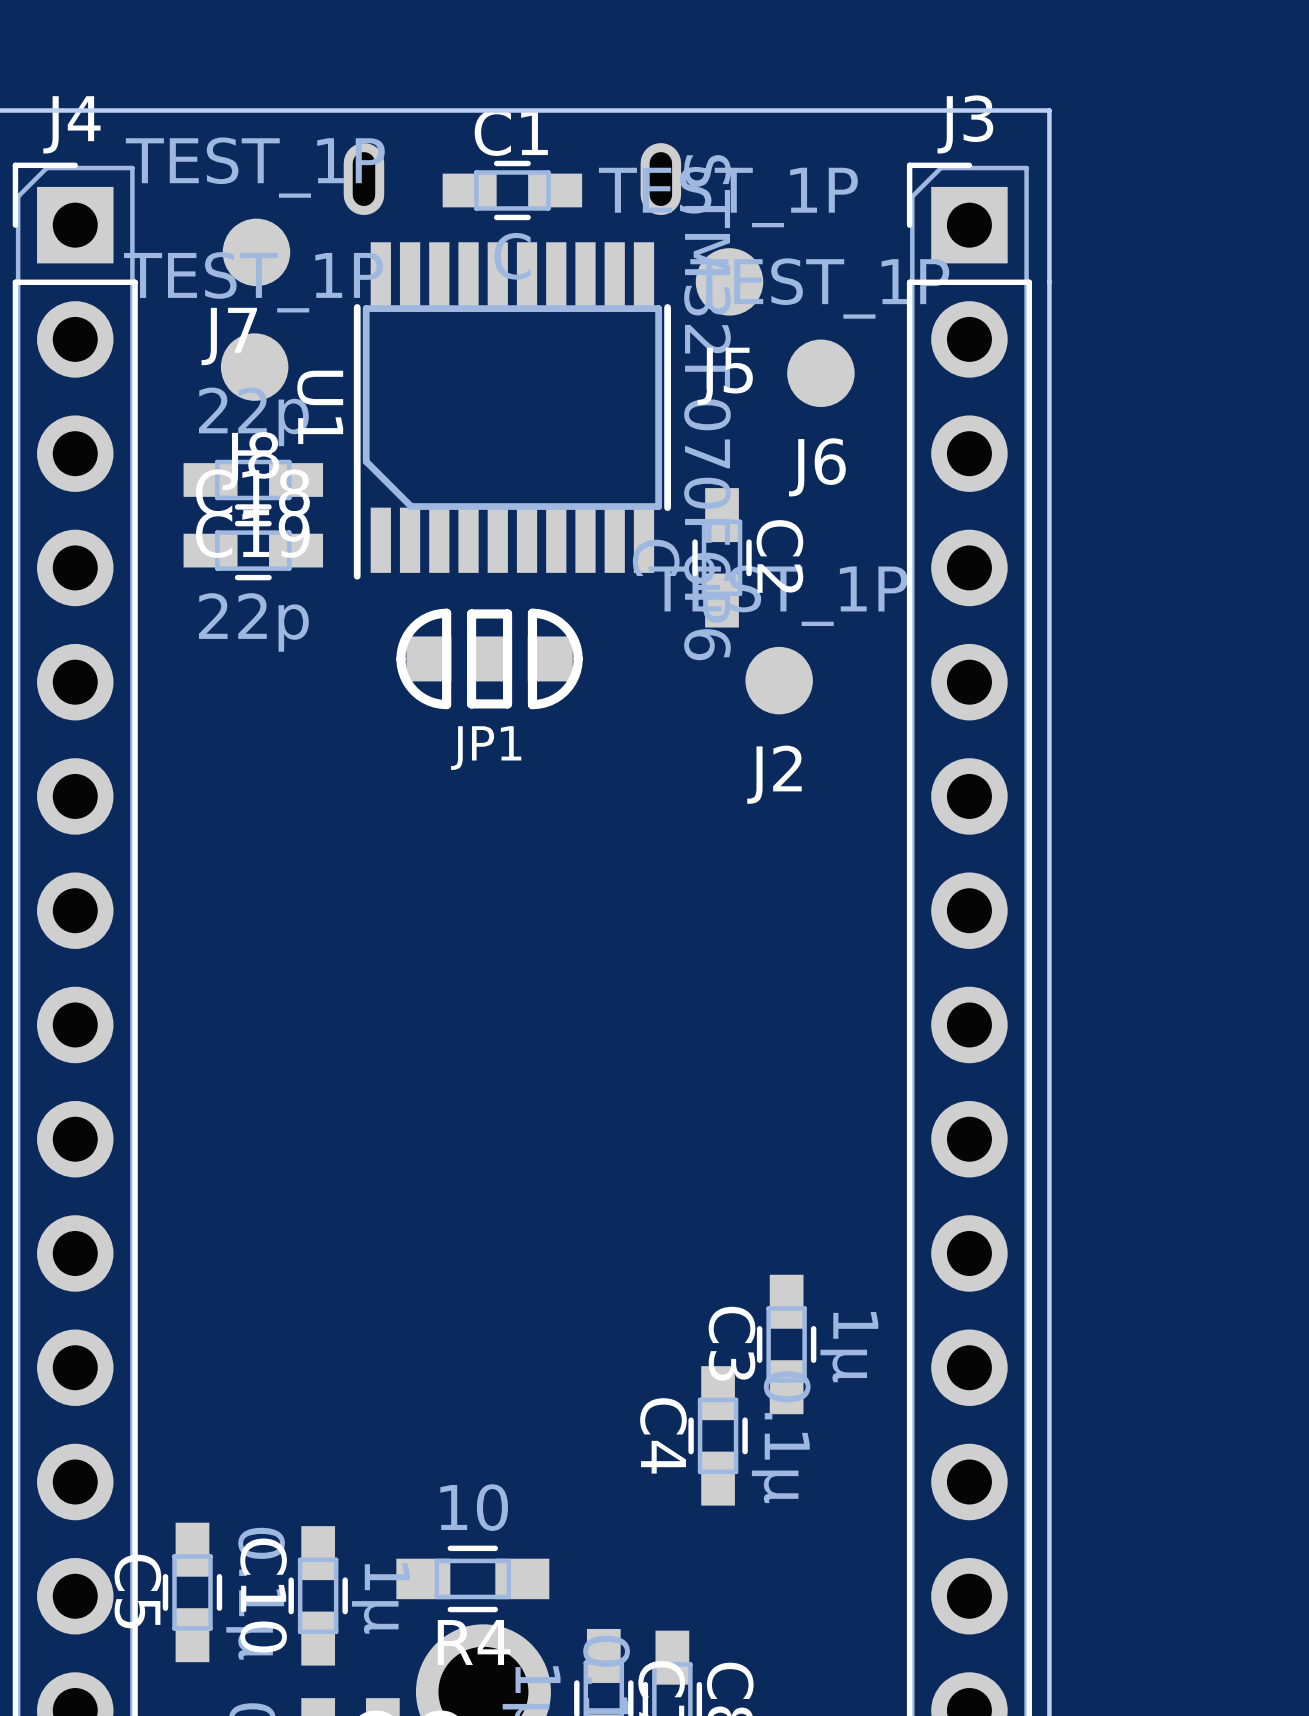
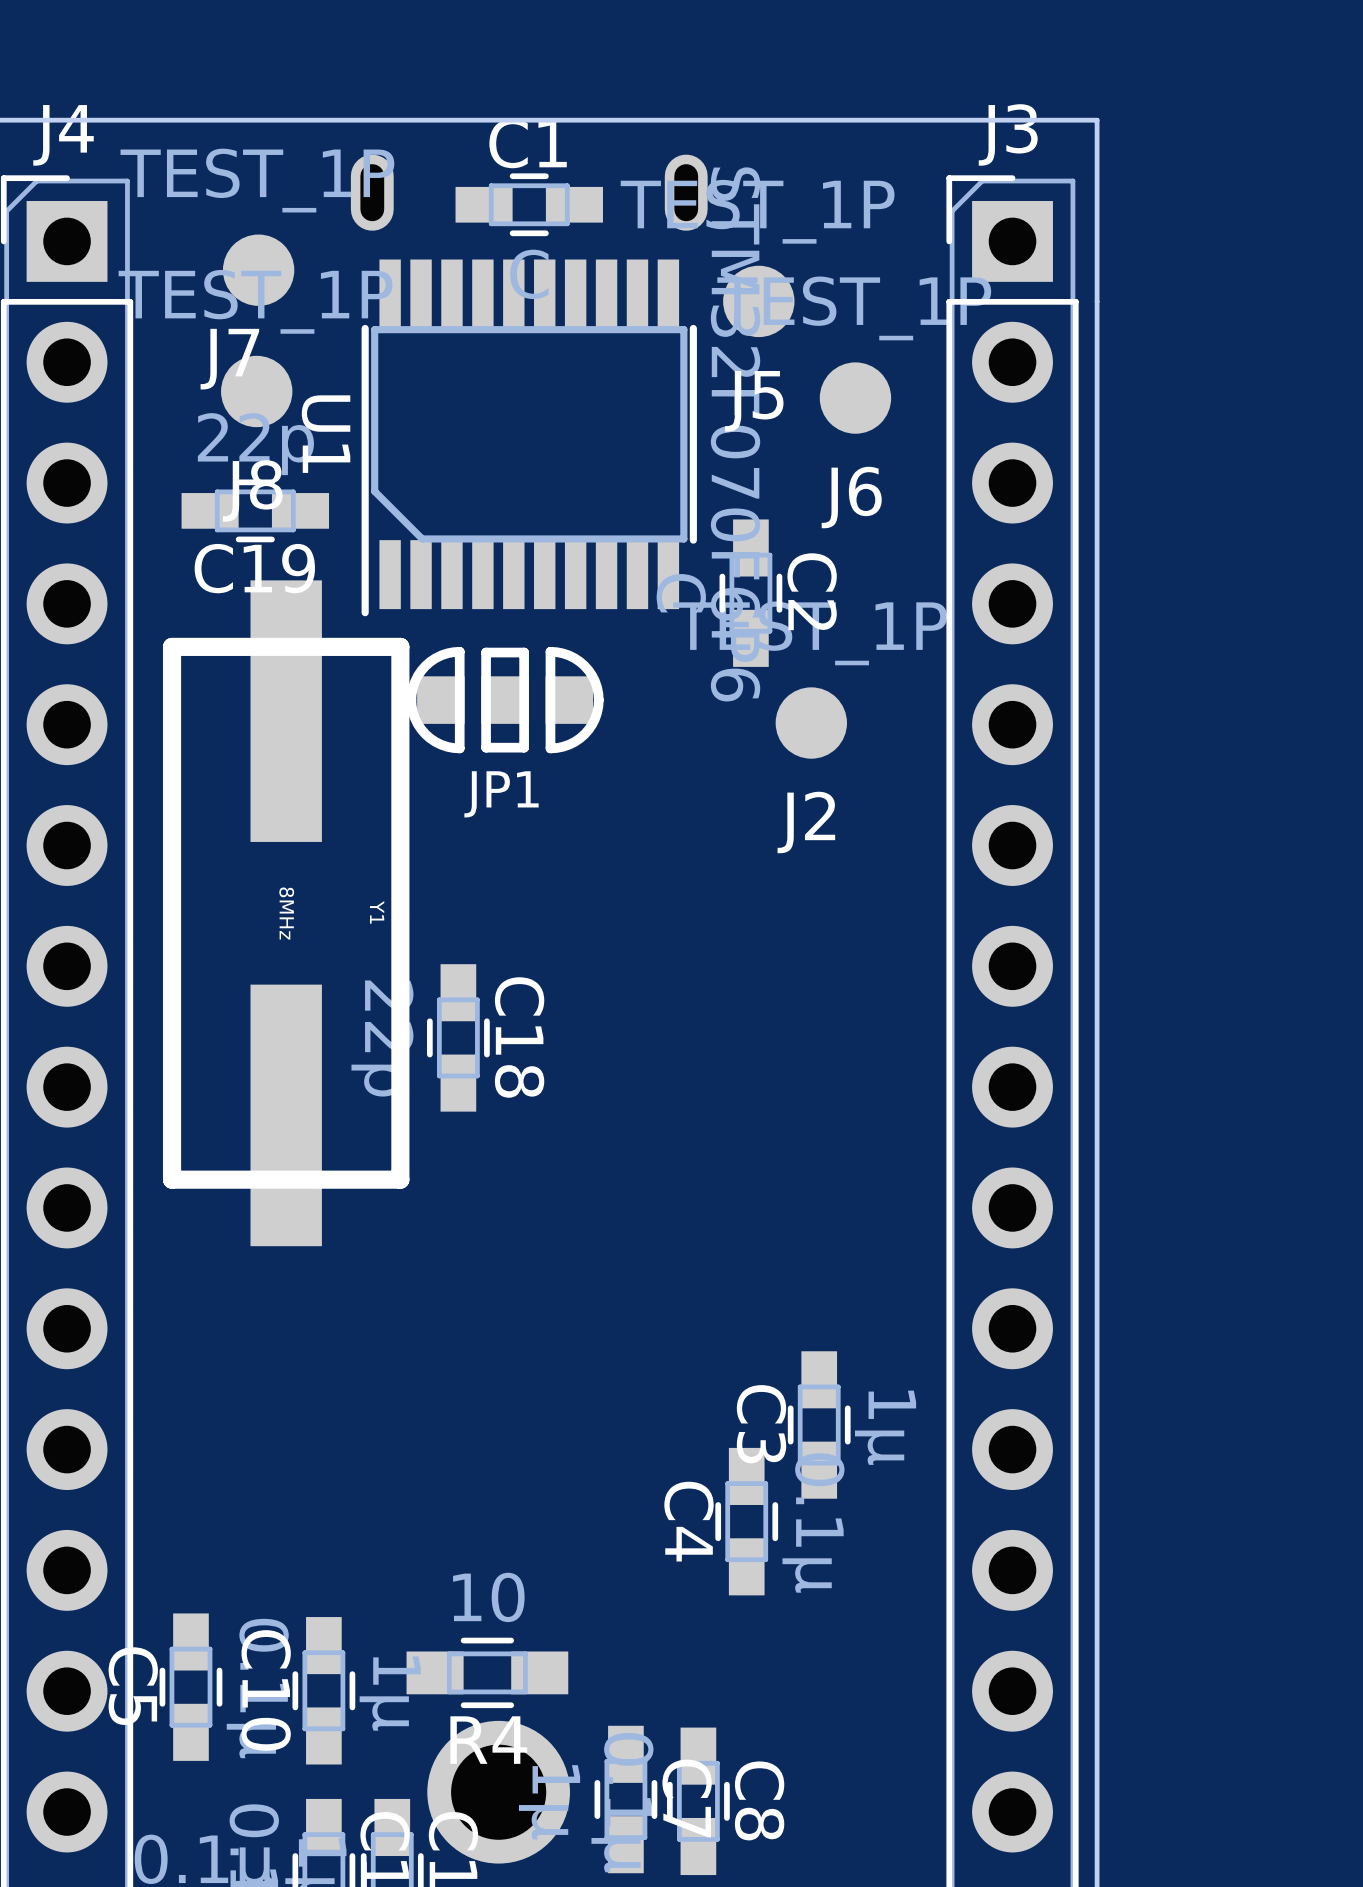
C18 rotation: 0° (253, 550) -> 90° clockwise (458, 1037)
C18 position: (253, 550) -> (458, 1037)
Y1: none -> 8MHz (286, 913)

